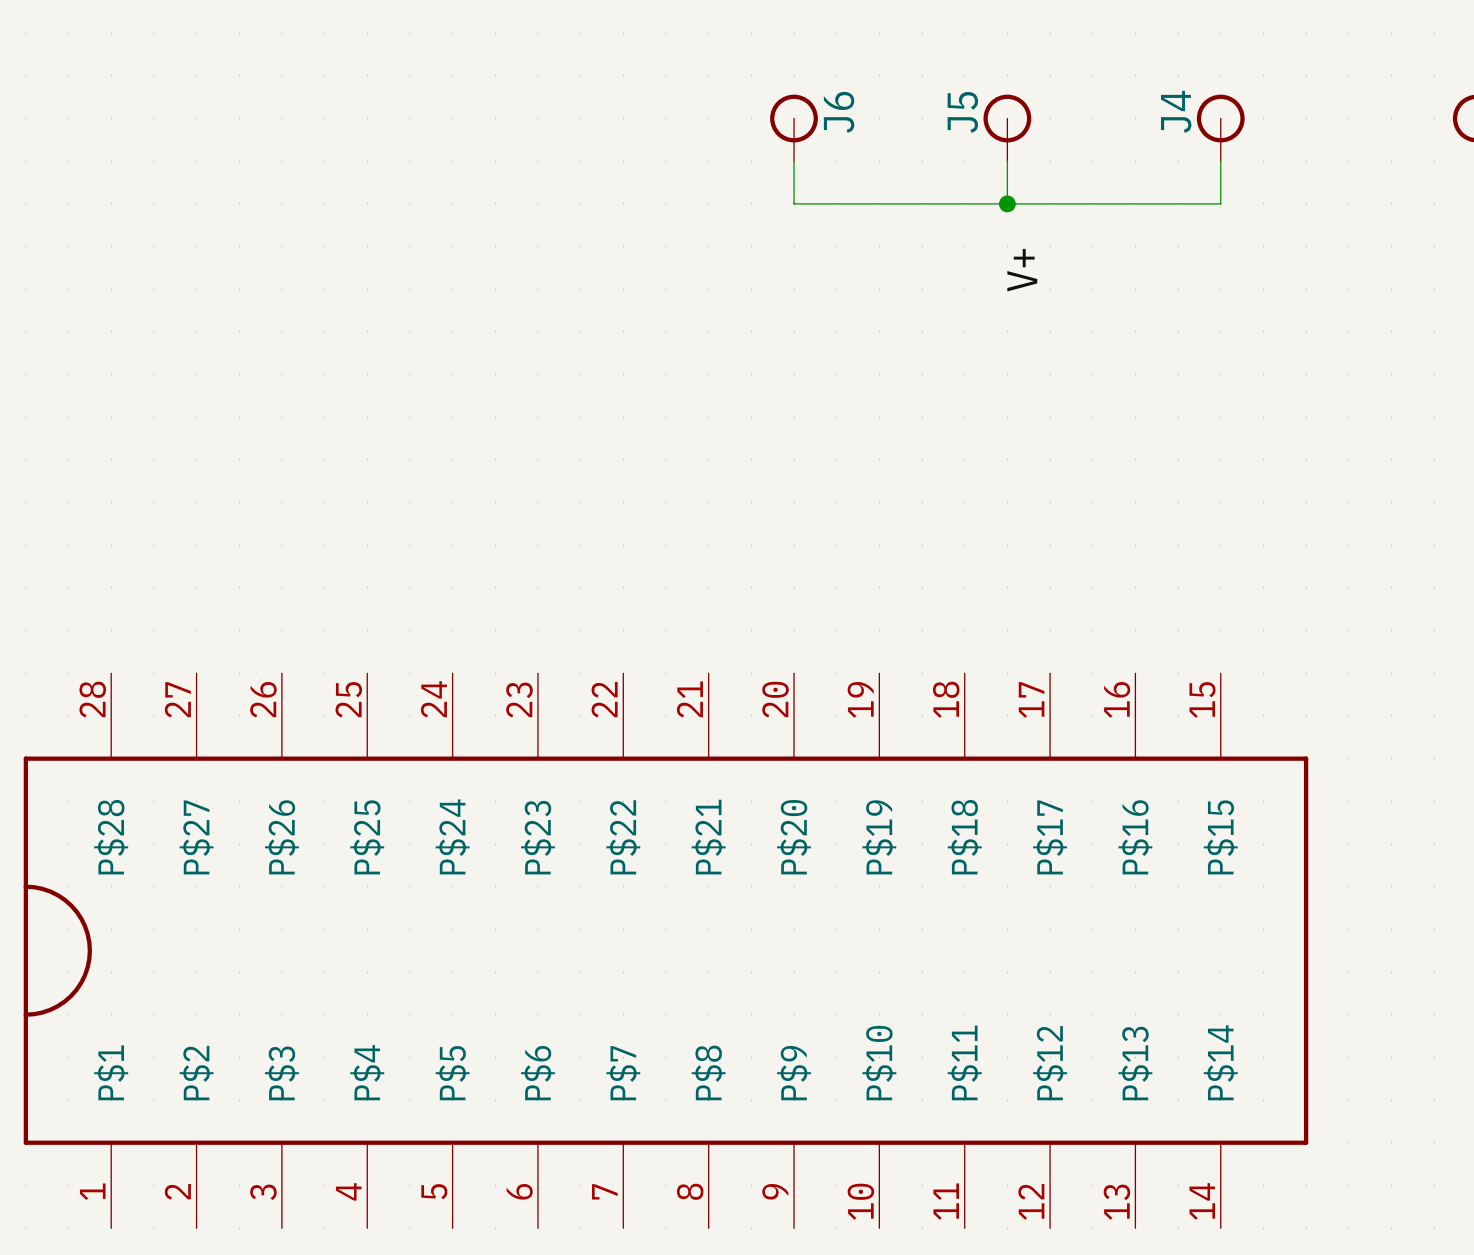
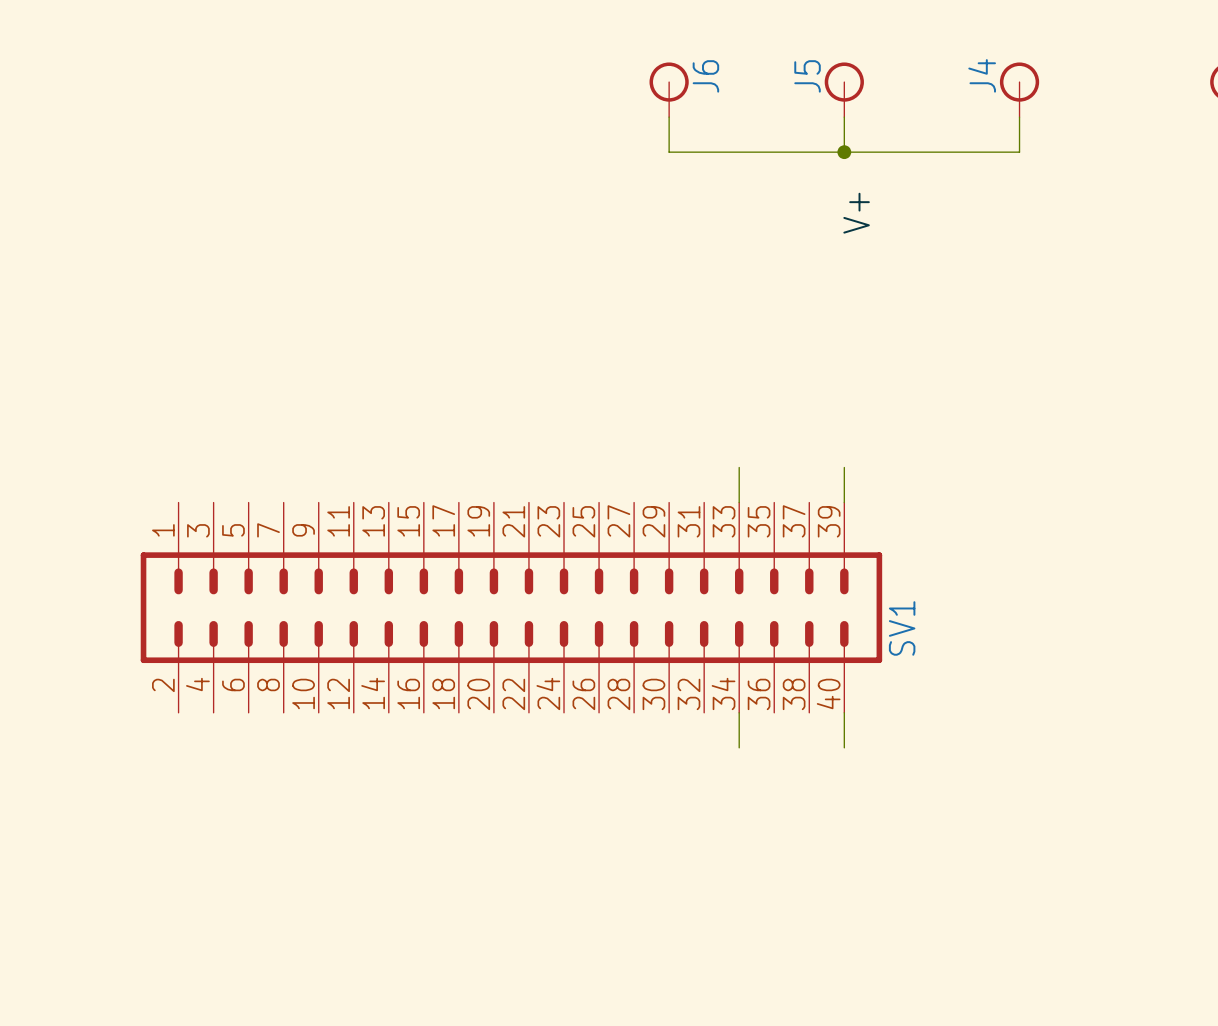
wire: none -> (739, 467) (739, 502)
wire: none -> (844, 467) (844, 502)
SV1: none -> (511, 607)
wire: none -> (739, 712) (739, 747)
wire: none -> (844, 712) (844, 747)
part: (665, 950) -> none

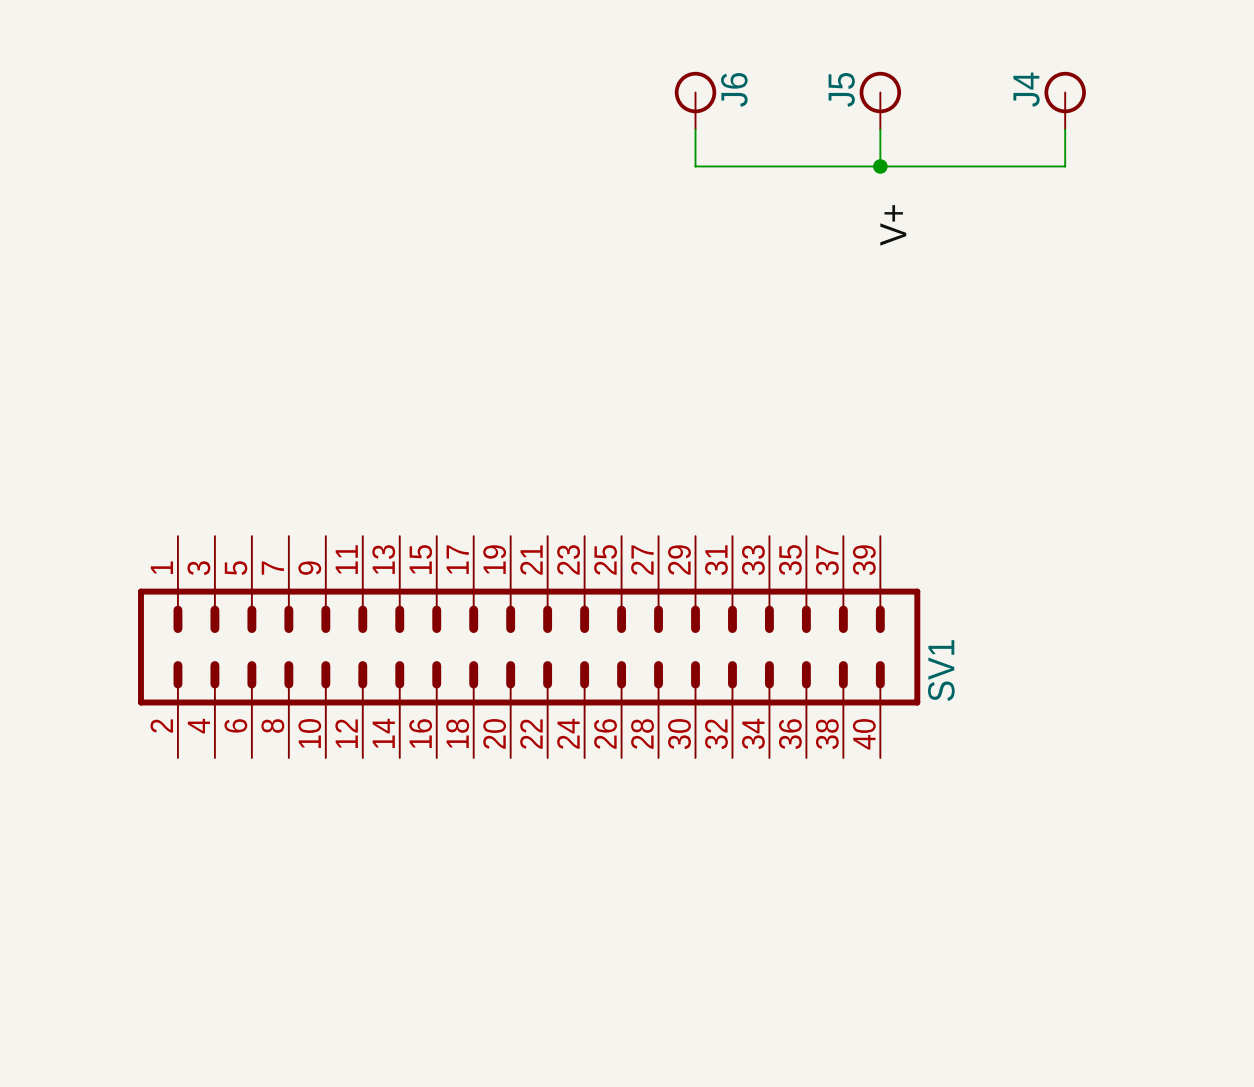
wire: (739, 467) (739, 502) -> none
wire: (844, 467) (844, 502) -> none
wire: (739, 712) (739, 747) -> none
wire: (844, 712) (844, 747) -> none

